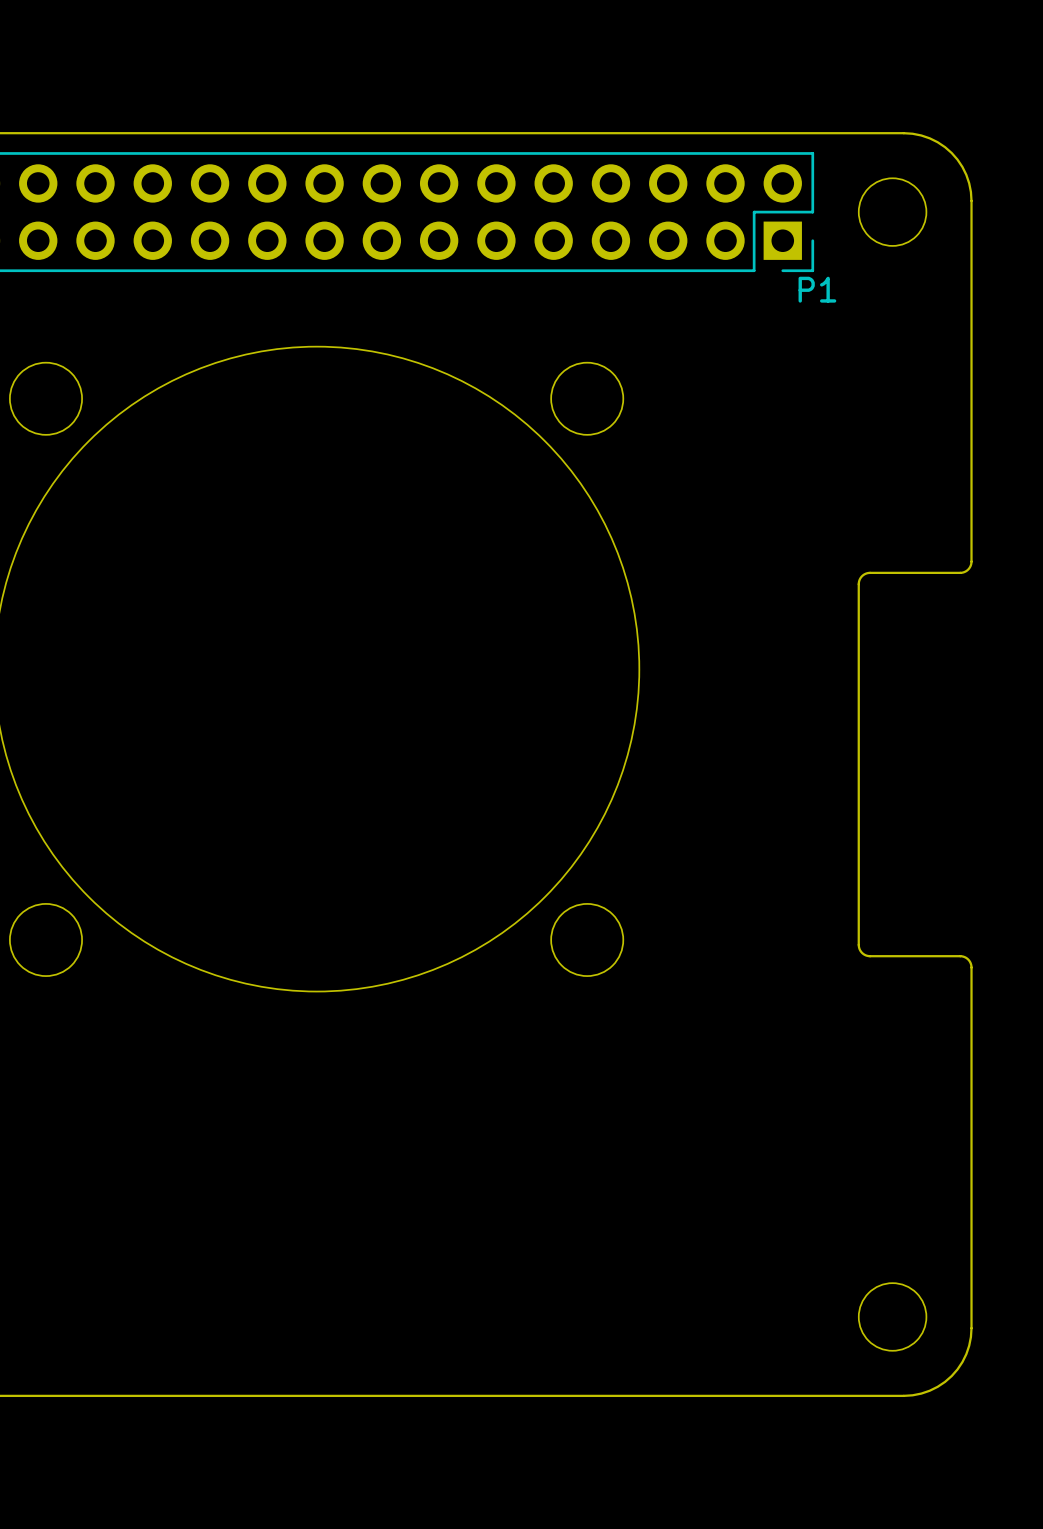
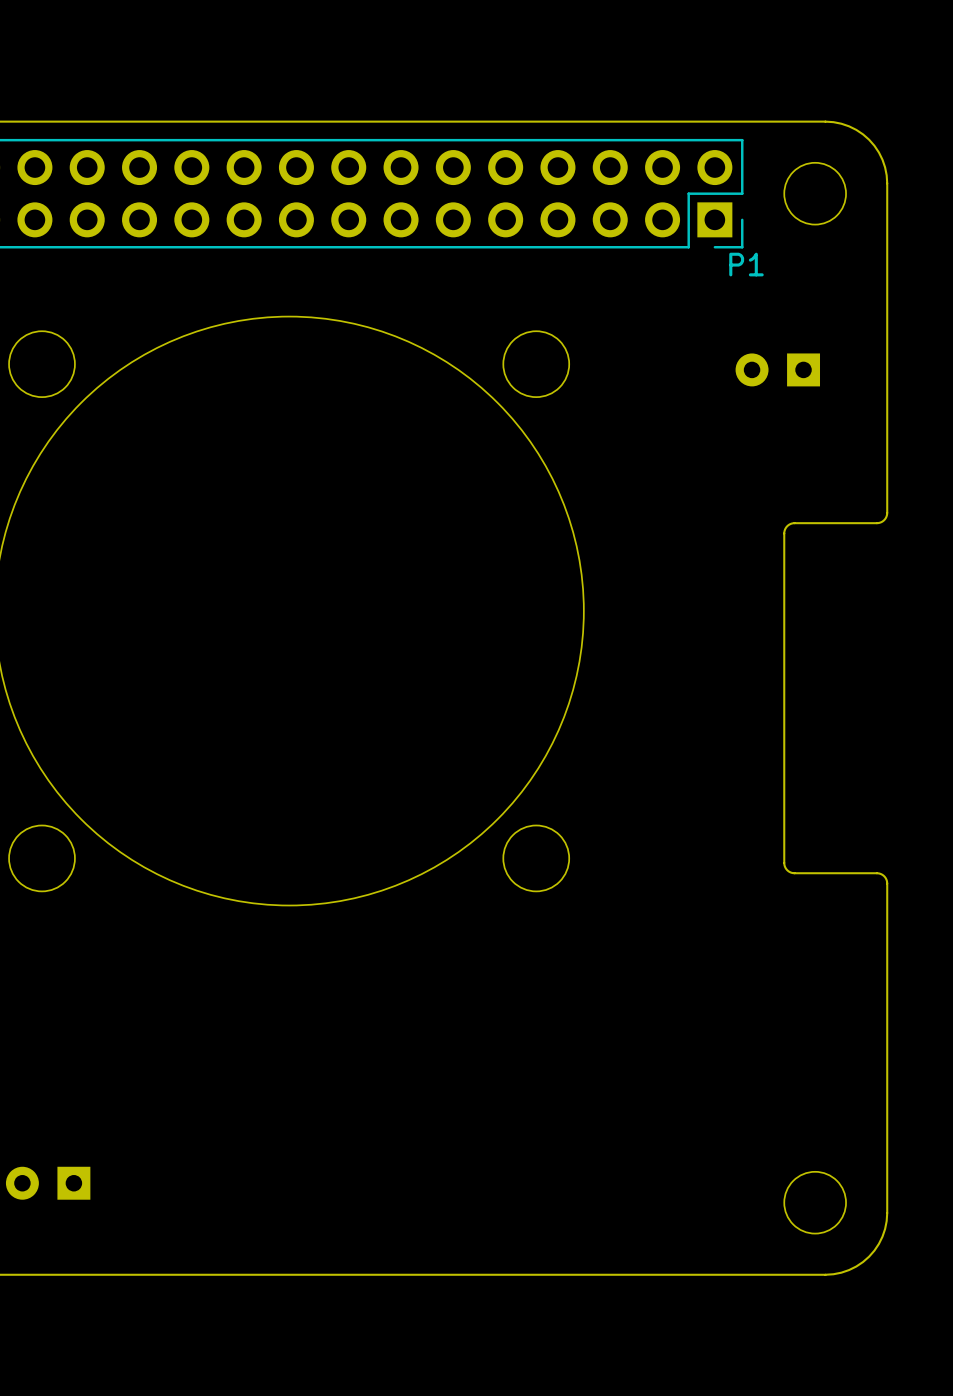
part: none -> (777, 369)
part: none -> (48, 1183)

